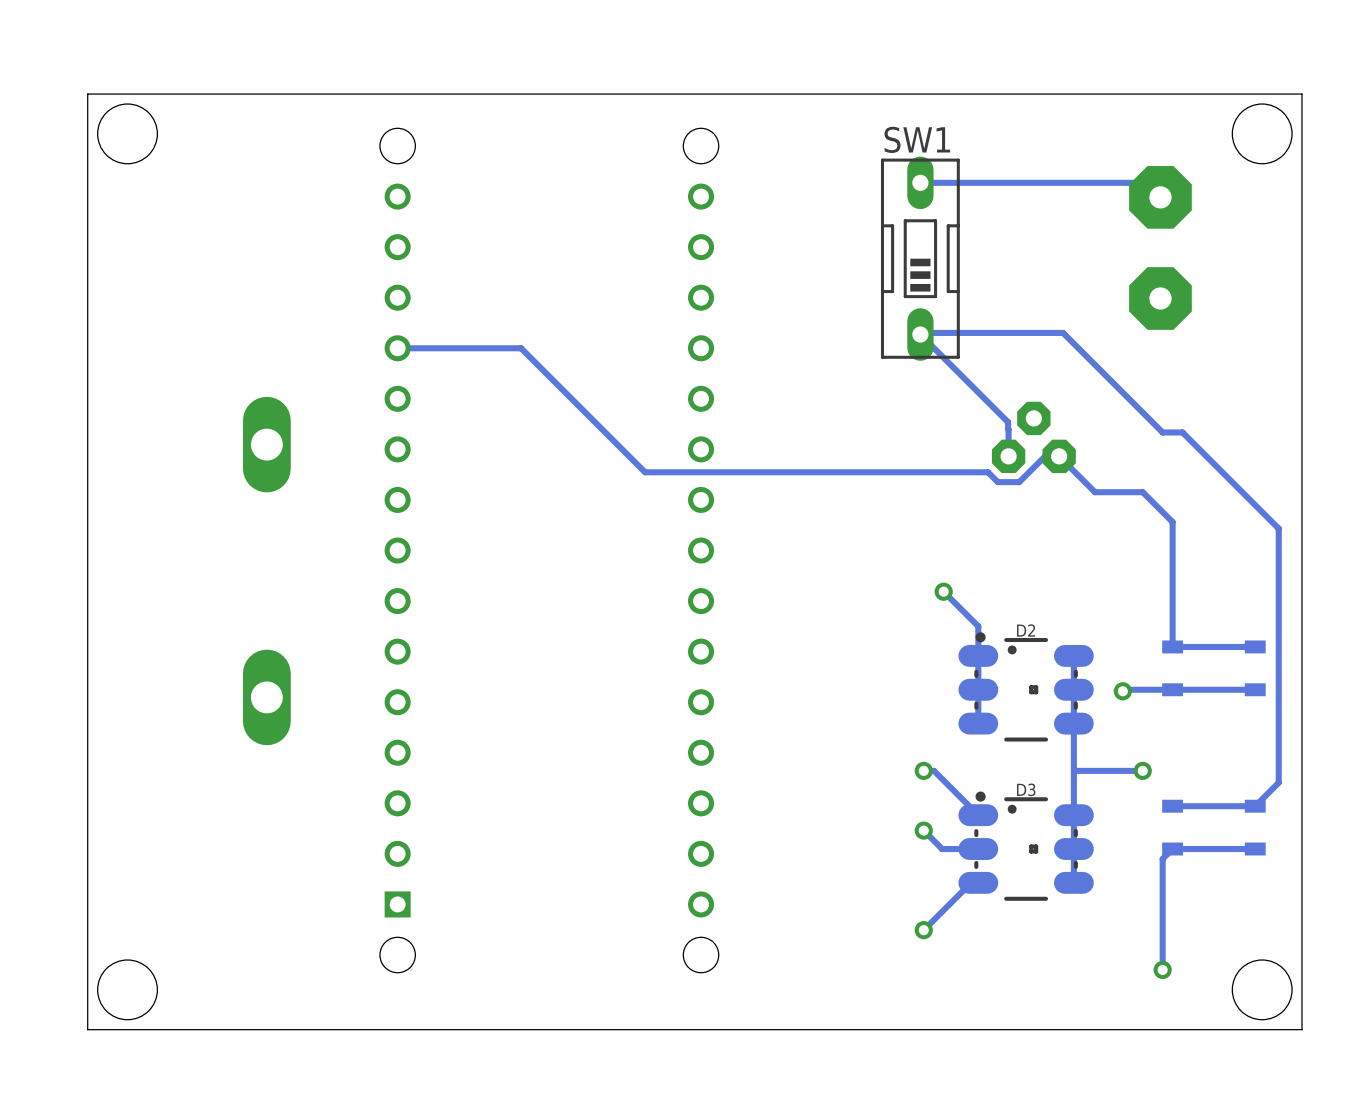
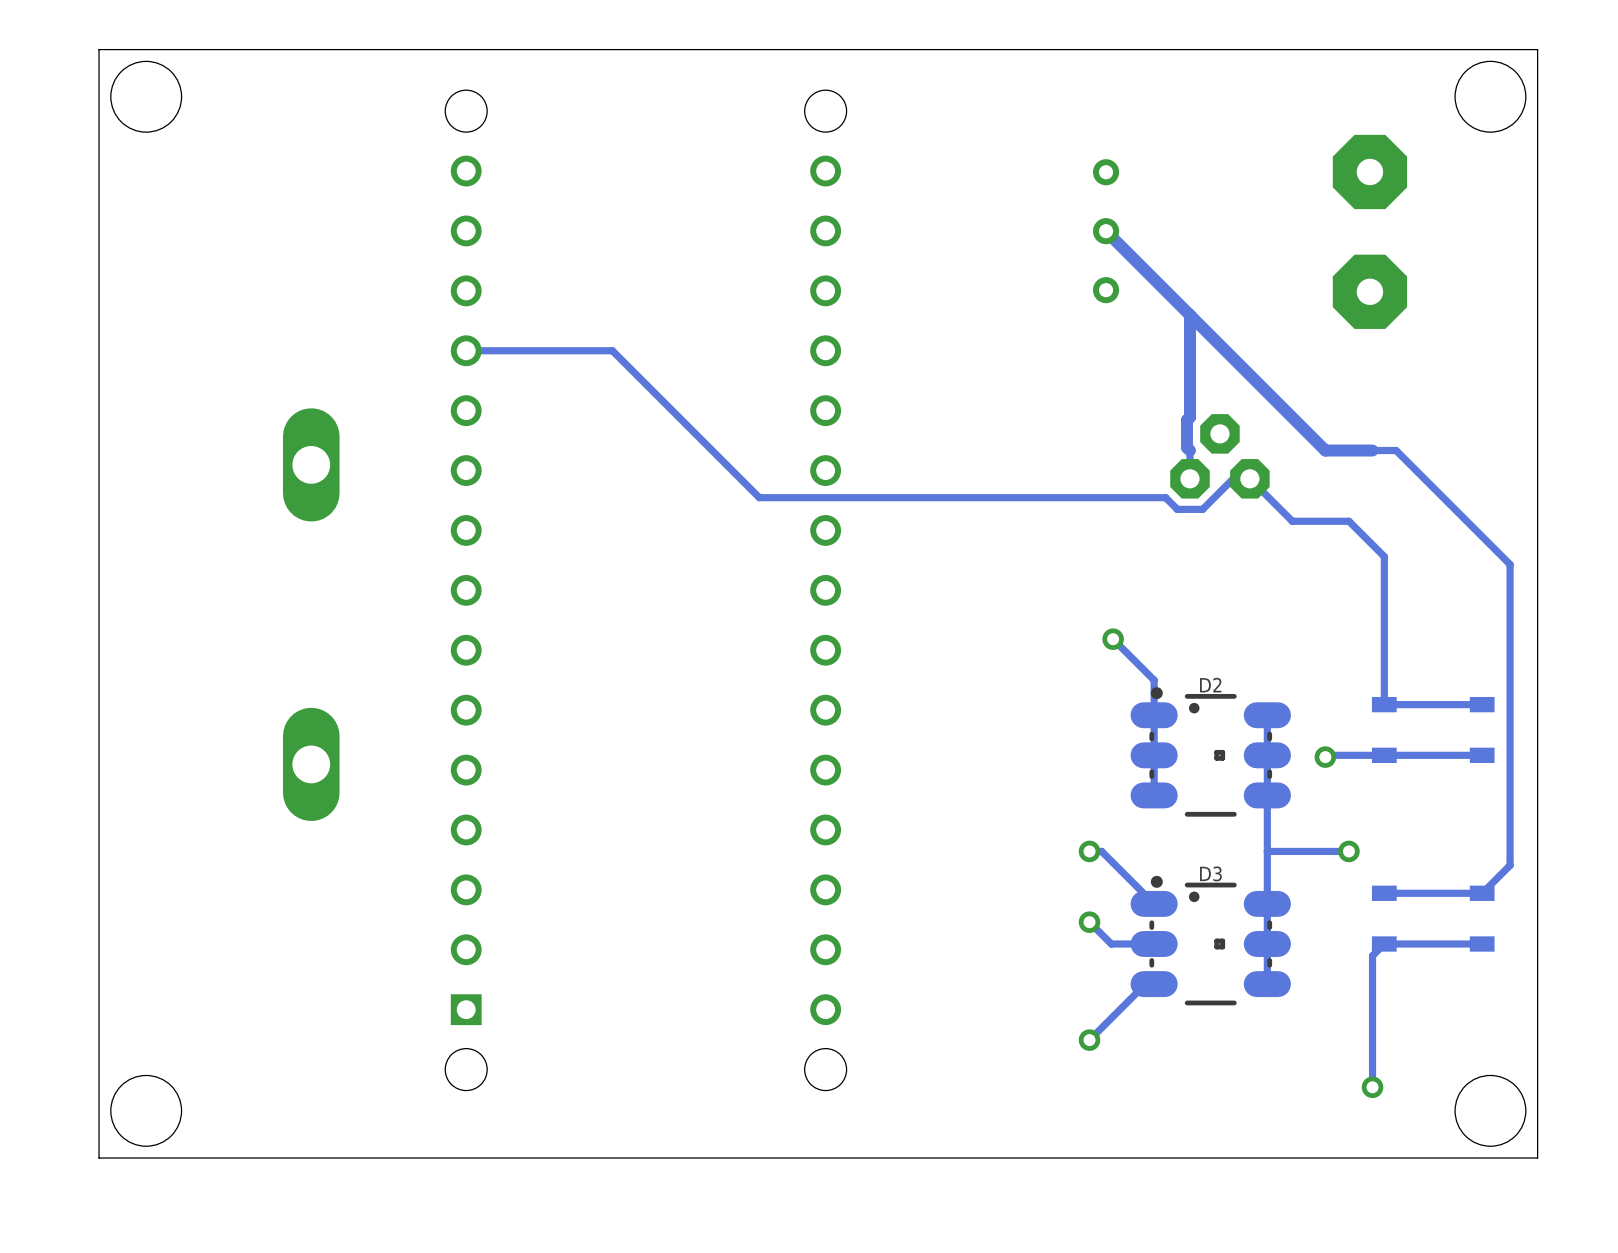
track: (920, 182) (1145, 182) (1160, 197) -> none
track: none -> (1106, 231) (1325, 450) (1372, 450)
part: none -> (1106, 231)
SW1: (920, 258) -> none
track: (1162, 432) (1063, 332) (921, 332) (920, 334) (1008, 422) (1008, 432) -> (1189, 315) (1189, 417) (1187, 420) (1187, 447) (1189, 450)

